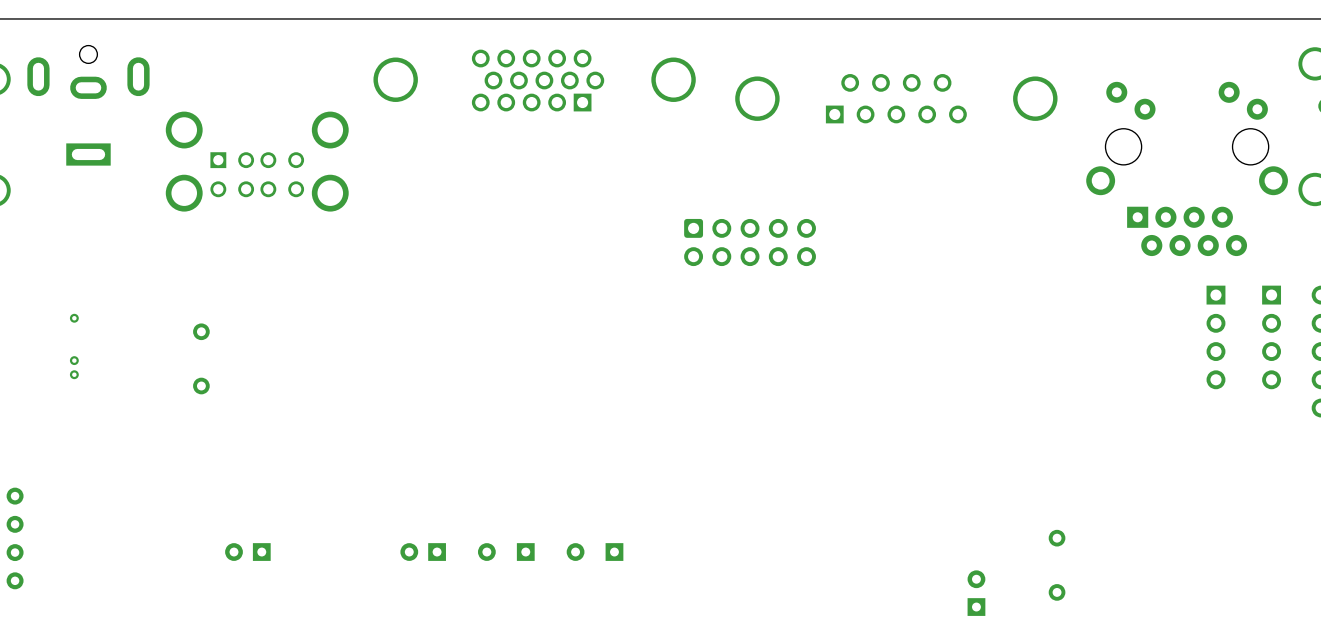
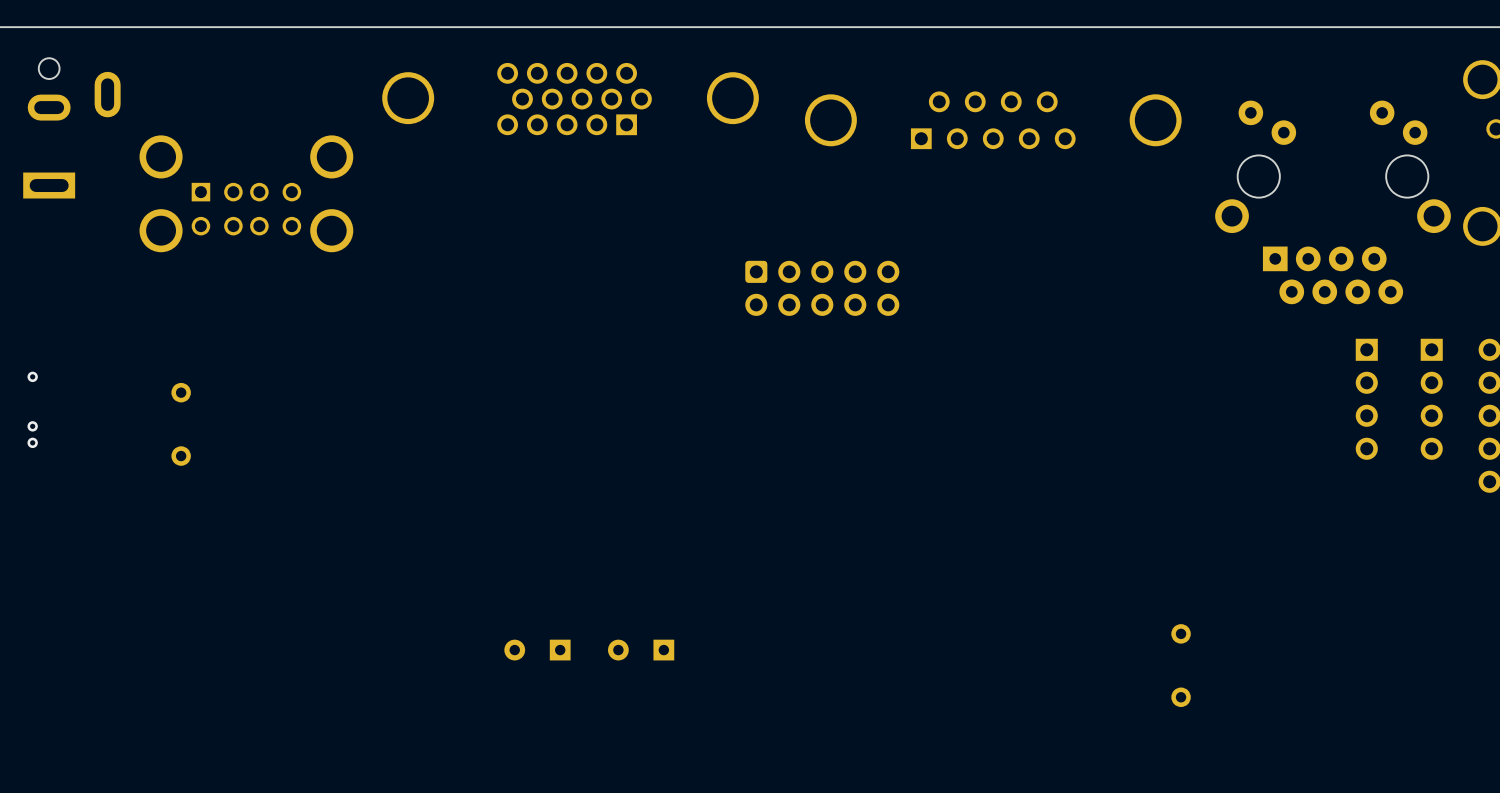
part: (247, 552) -> none
part: (423, 552) -> none
part: (976, 593) -> none

